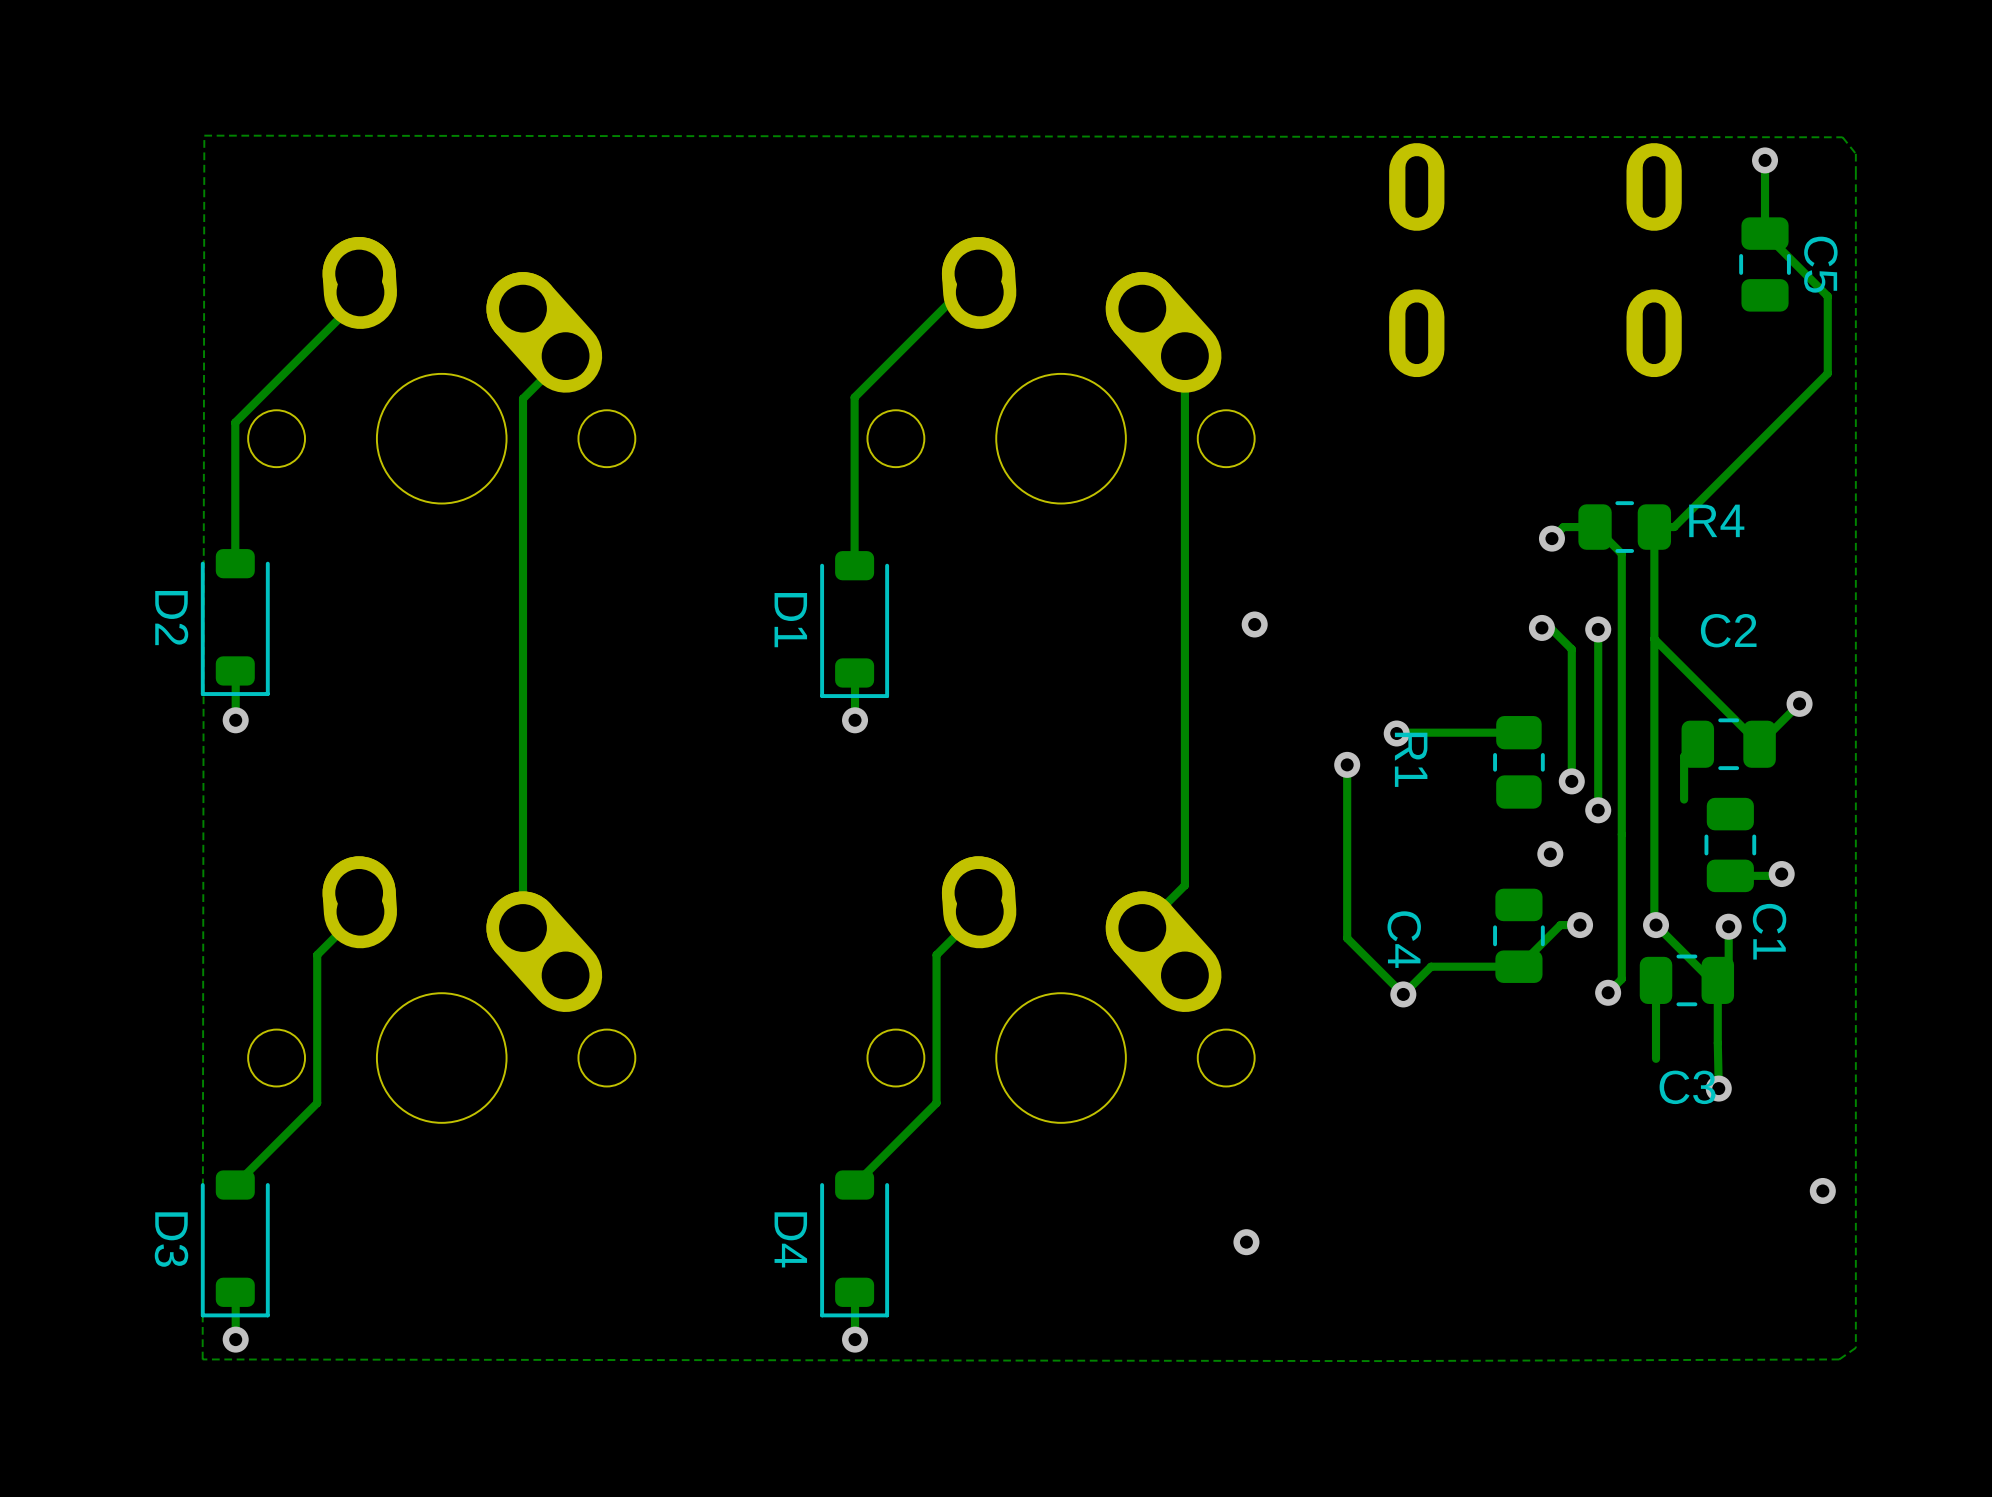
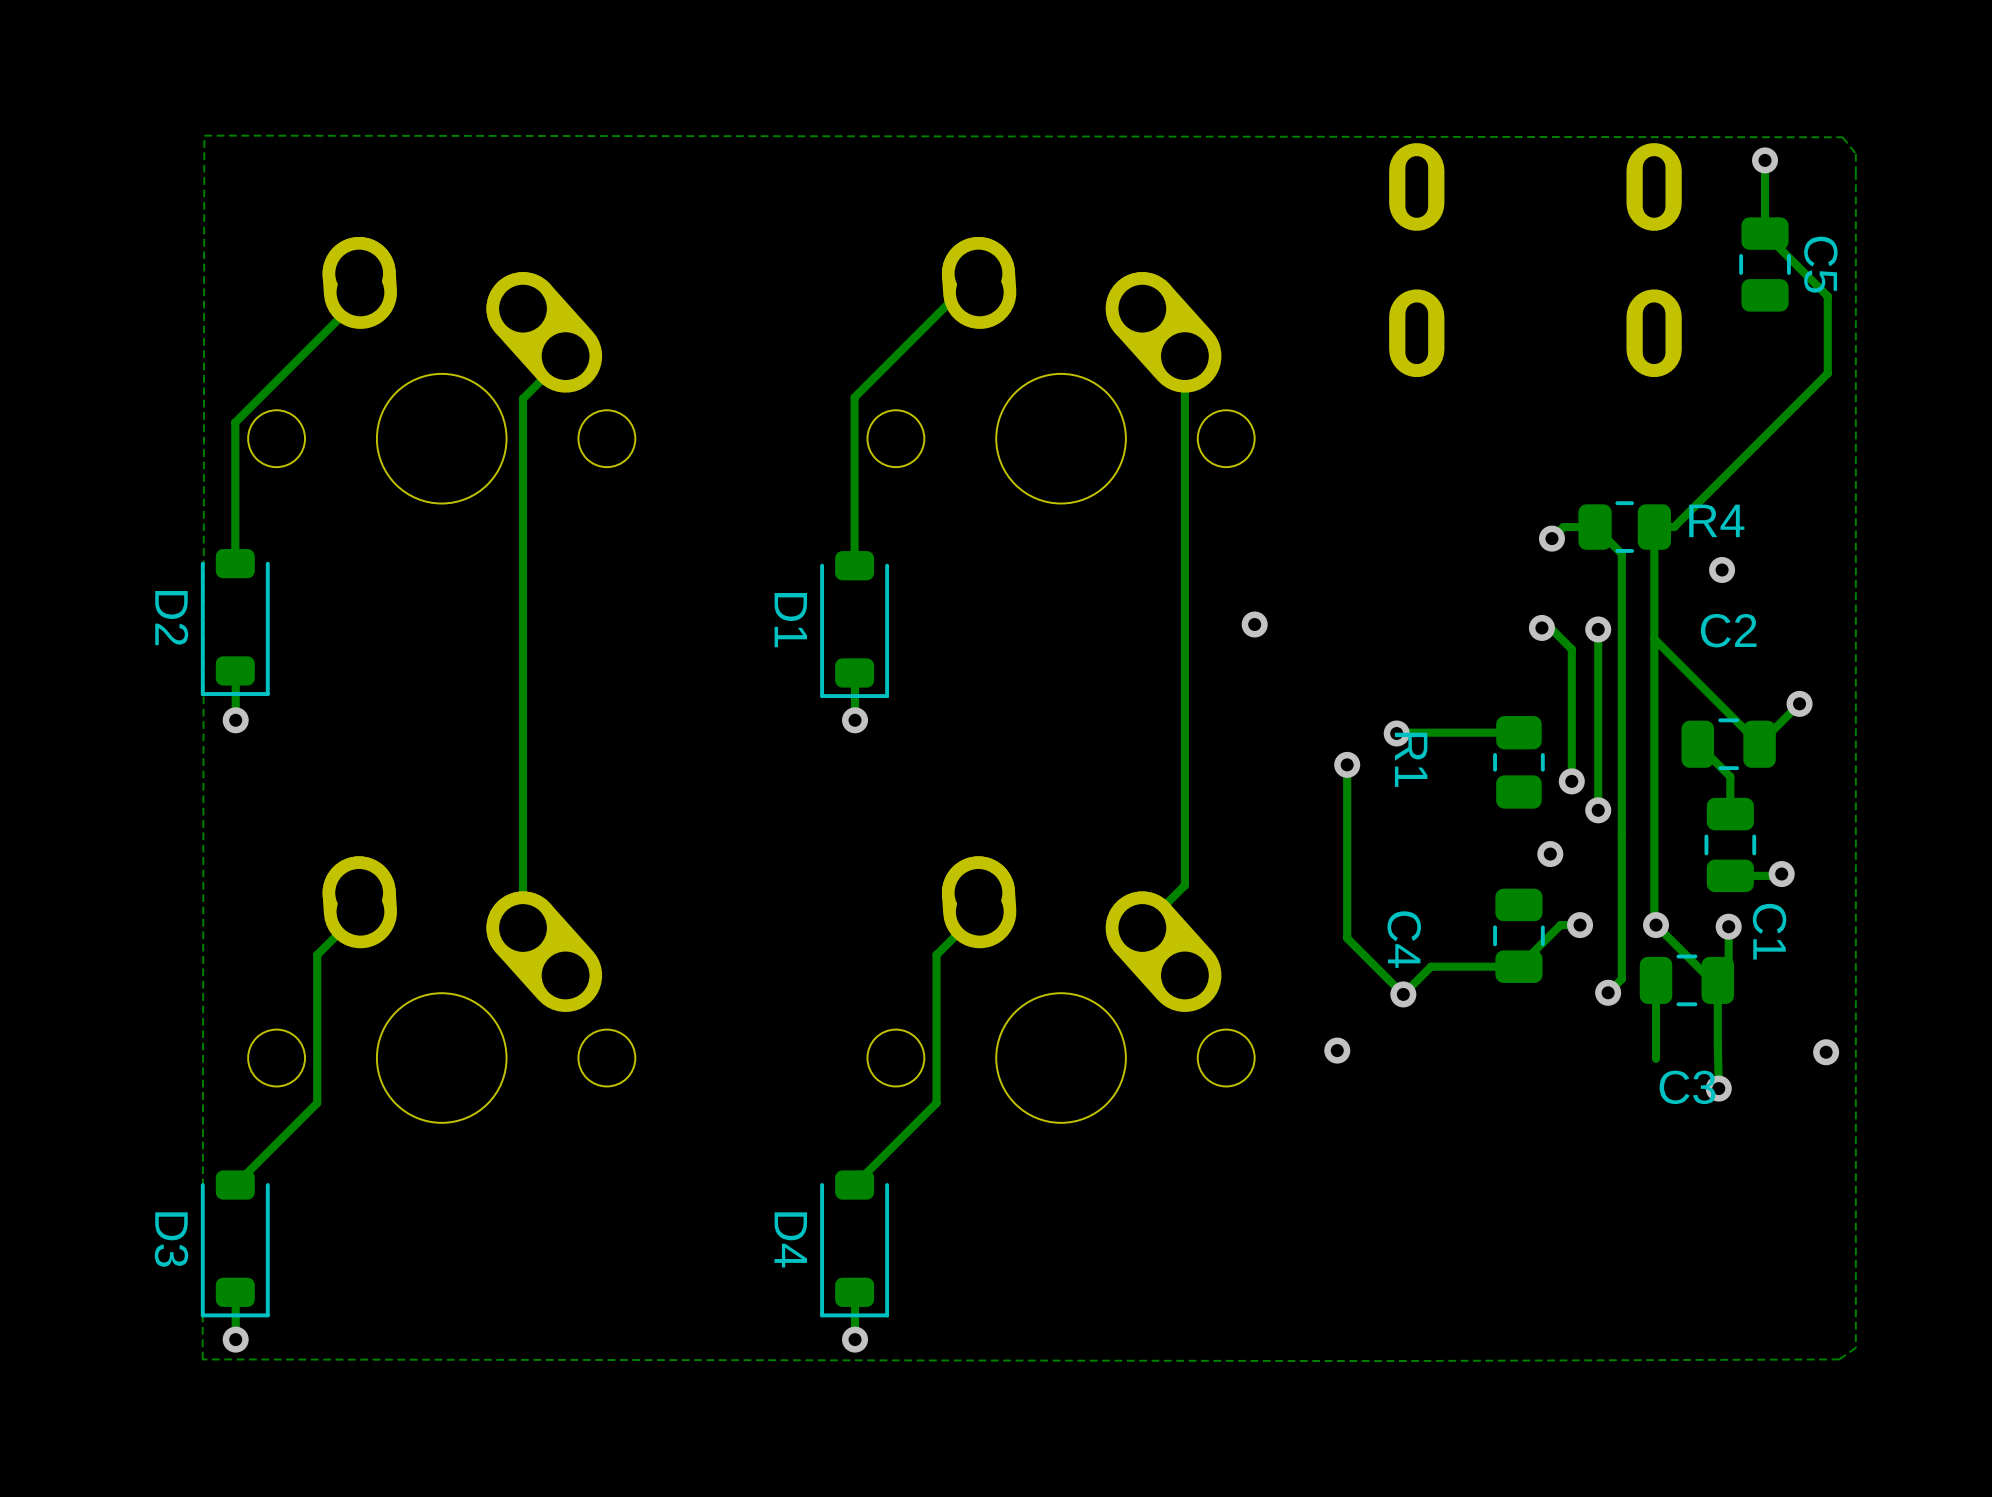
via: none -> (1722, 570)
track: (1697, 743) (1684, 756) (1684, 799) -> (1697, 744) (1730, 776) (1730, 814)
via: none -> (1337, 1050)
via position: (1822, 1190) -> (1826, 1052)
via: (1246, 1242) -> none

